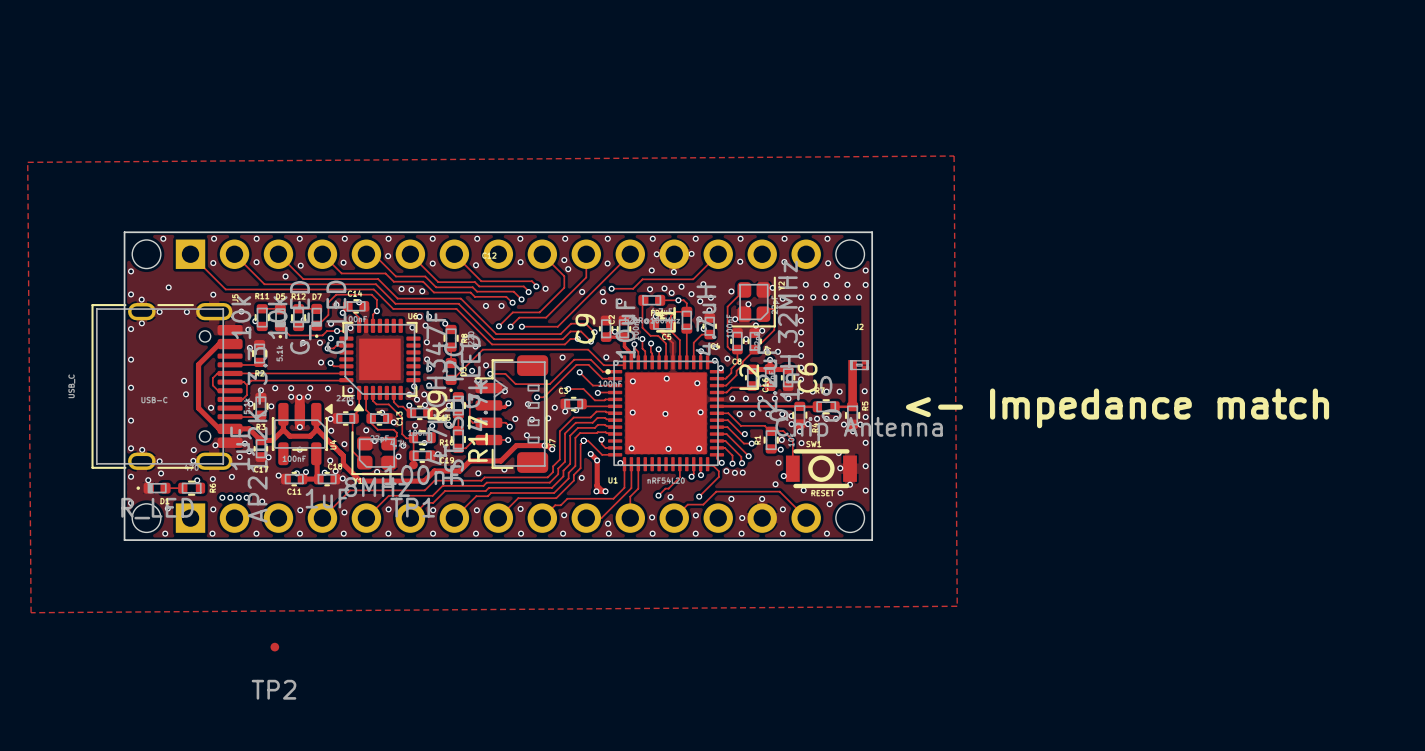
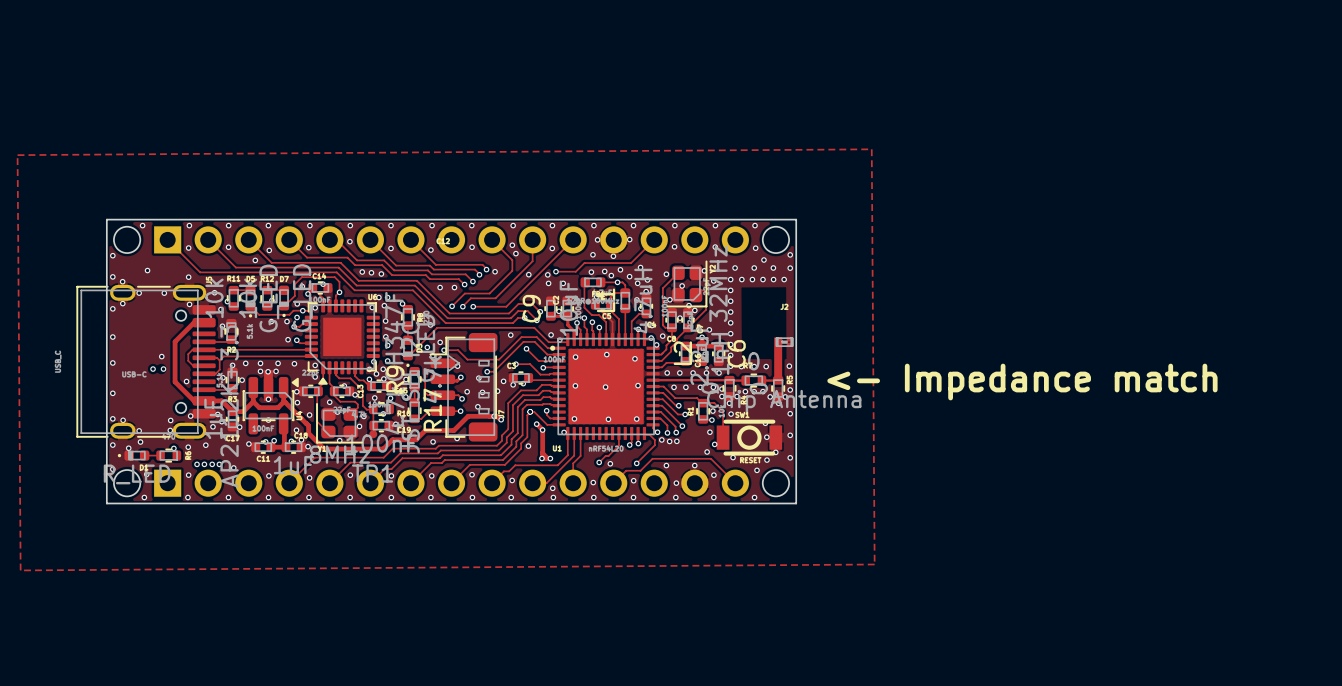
via: none -> (189, 304)
via: none -> (153, 369)
TP2: (274, 647) -> none

